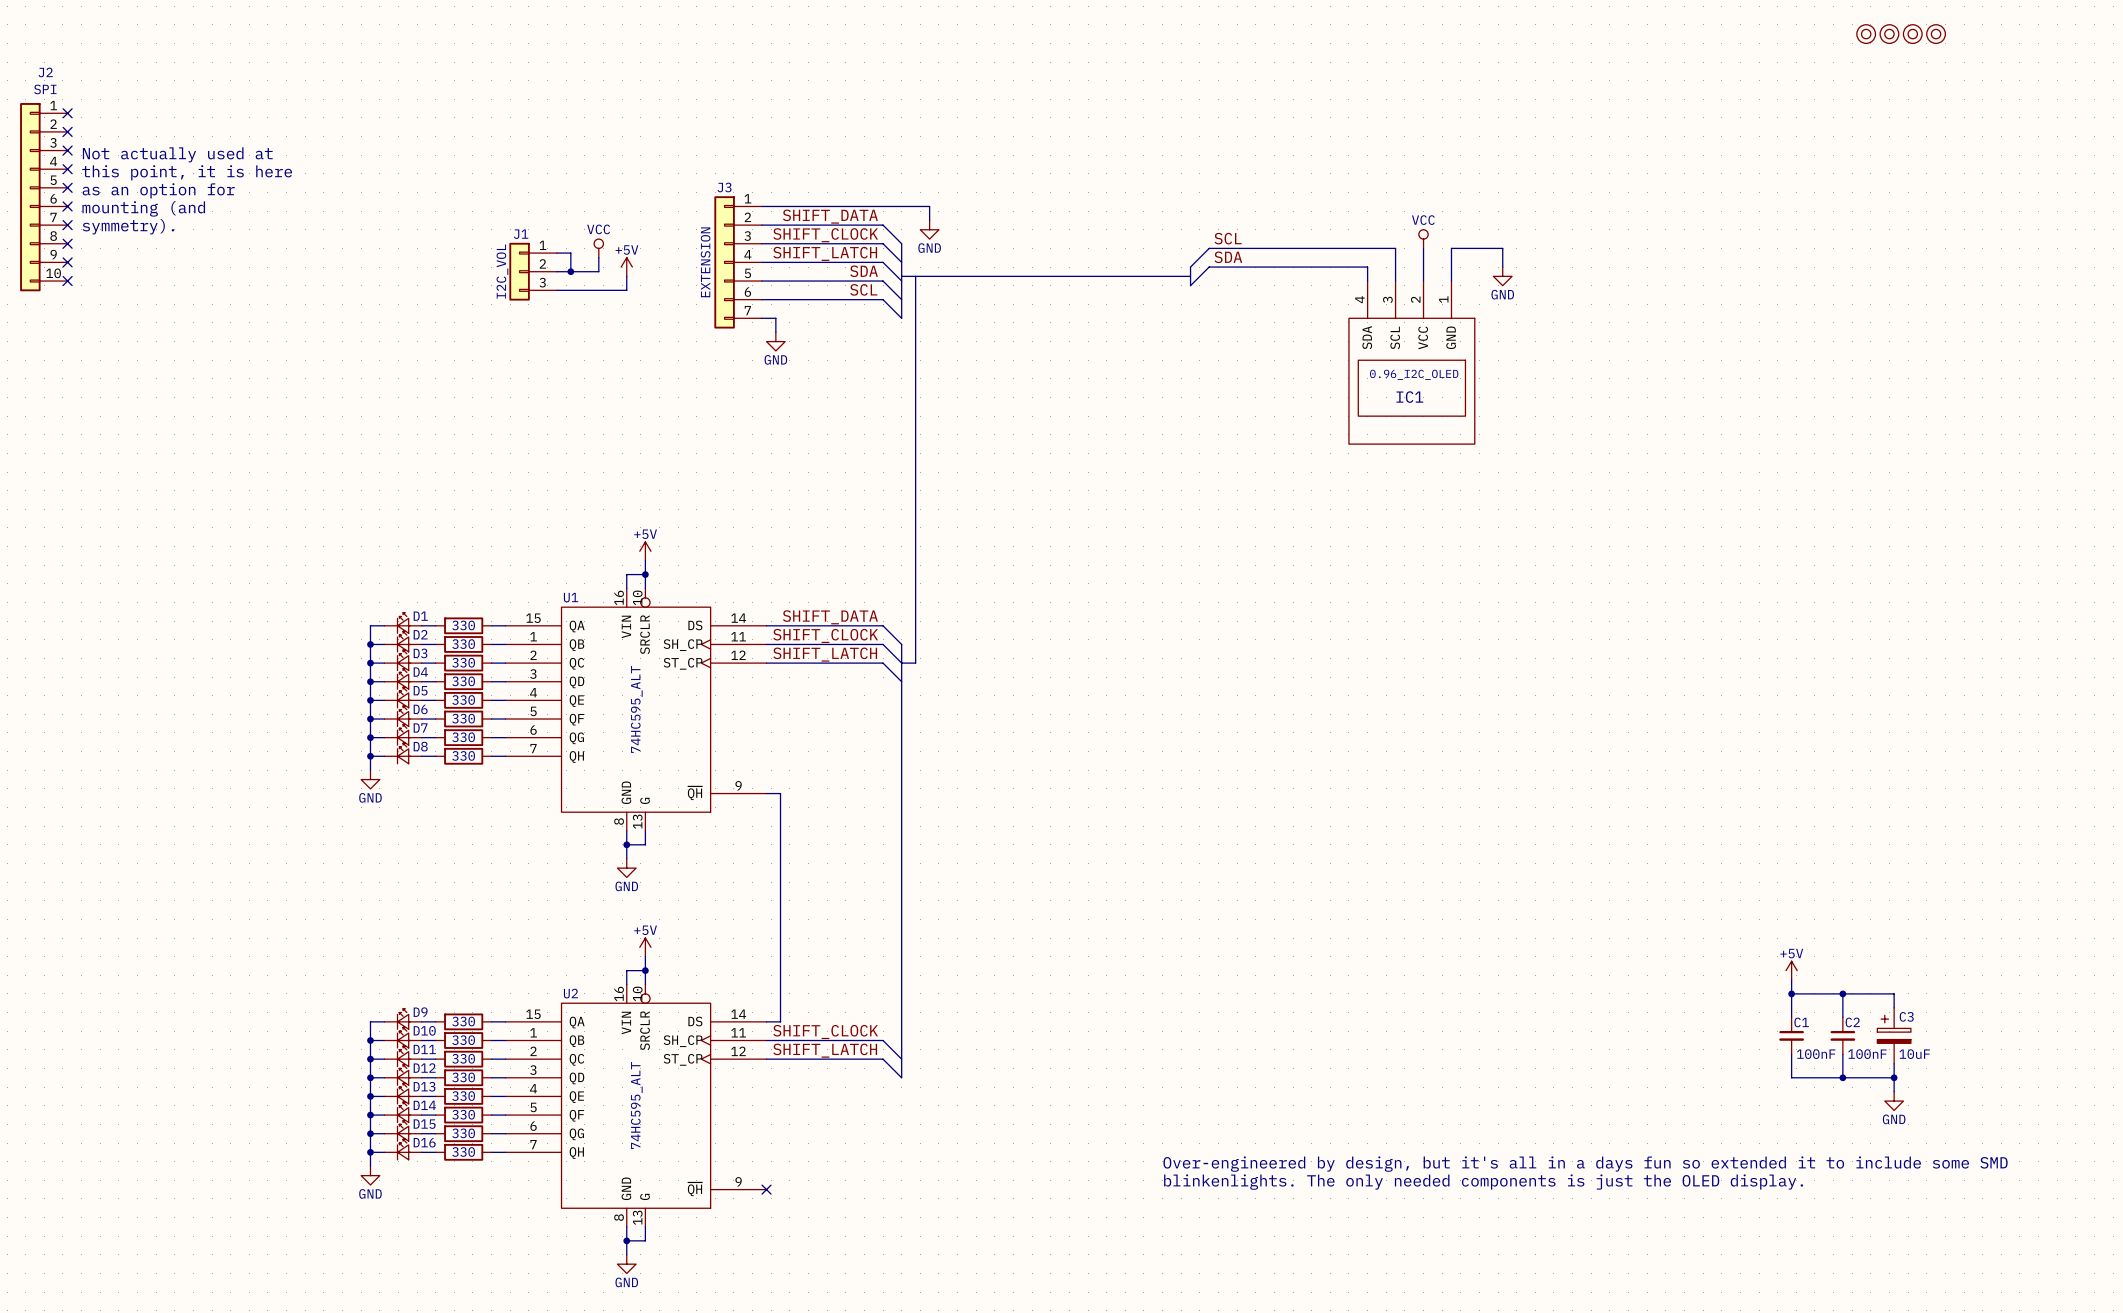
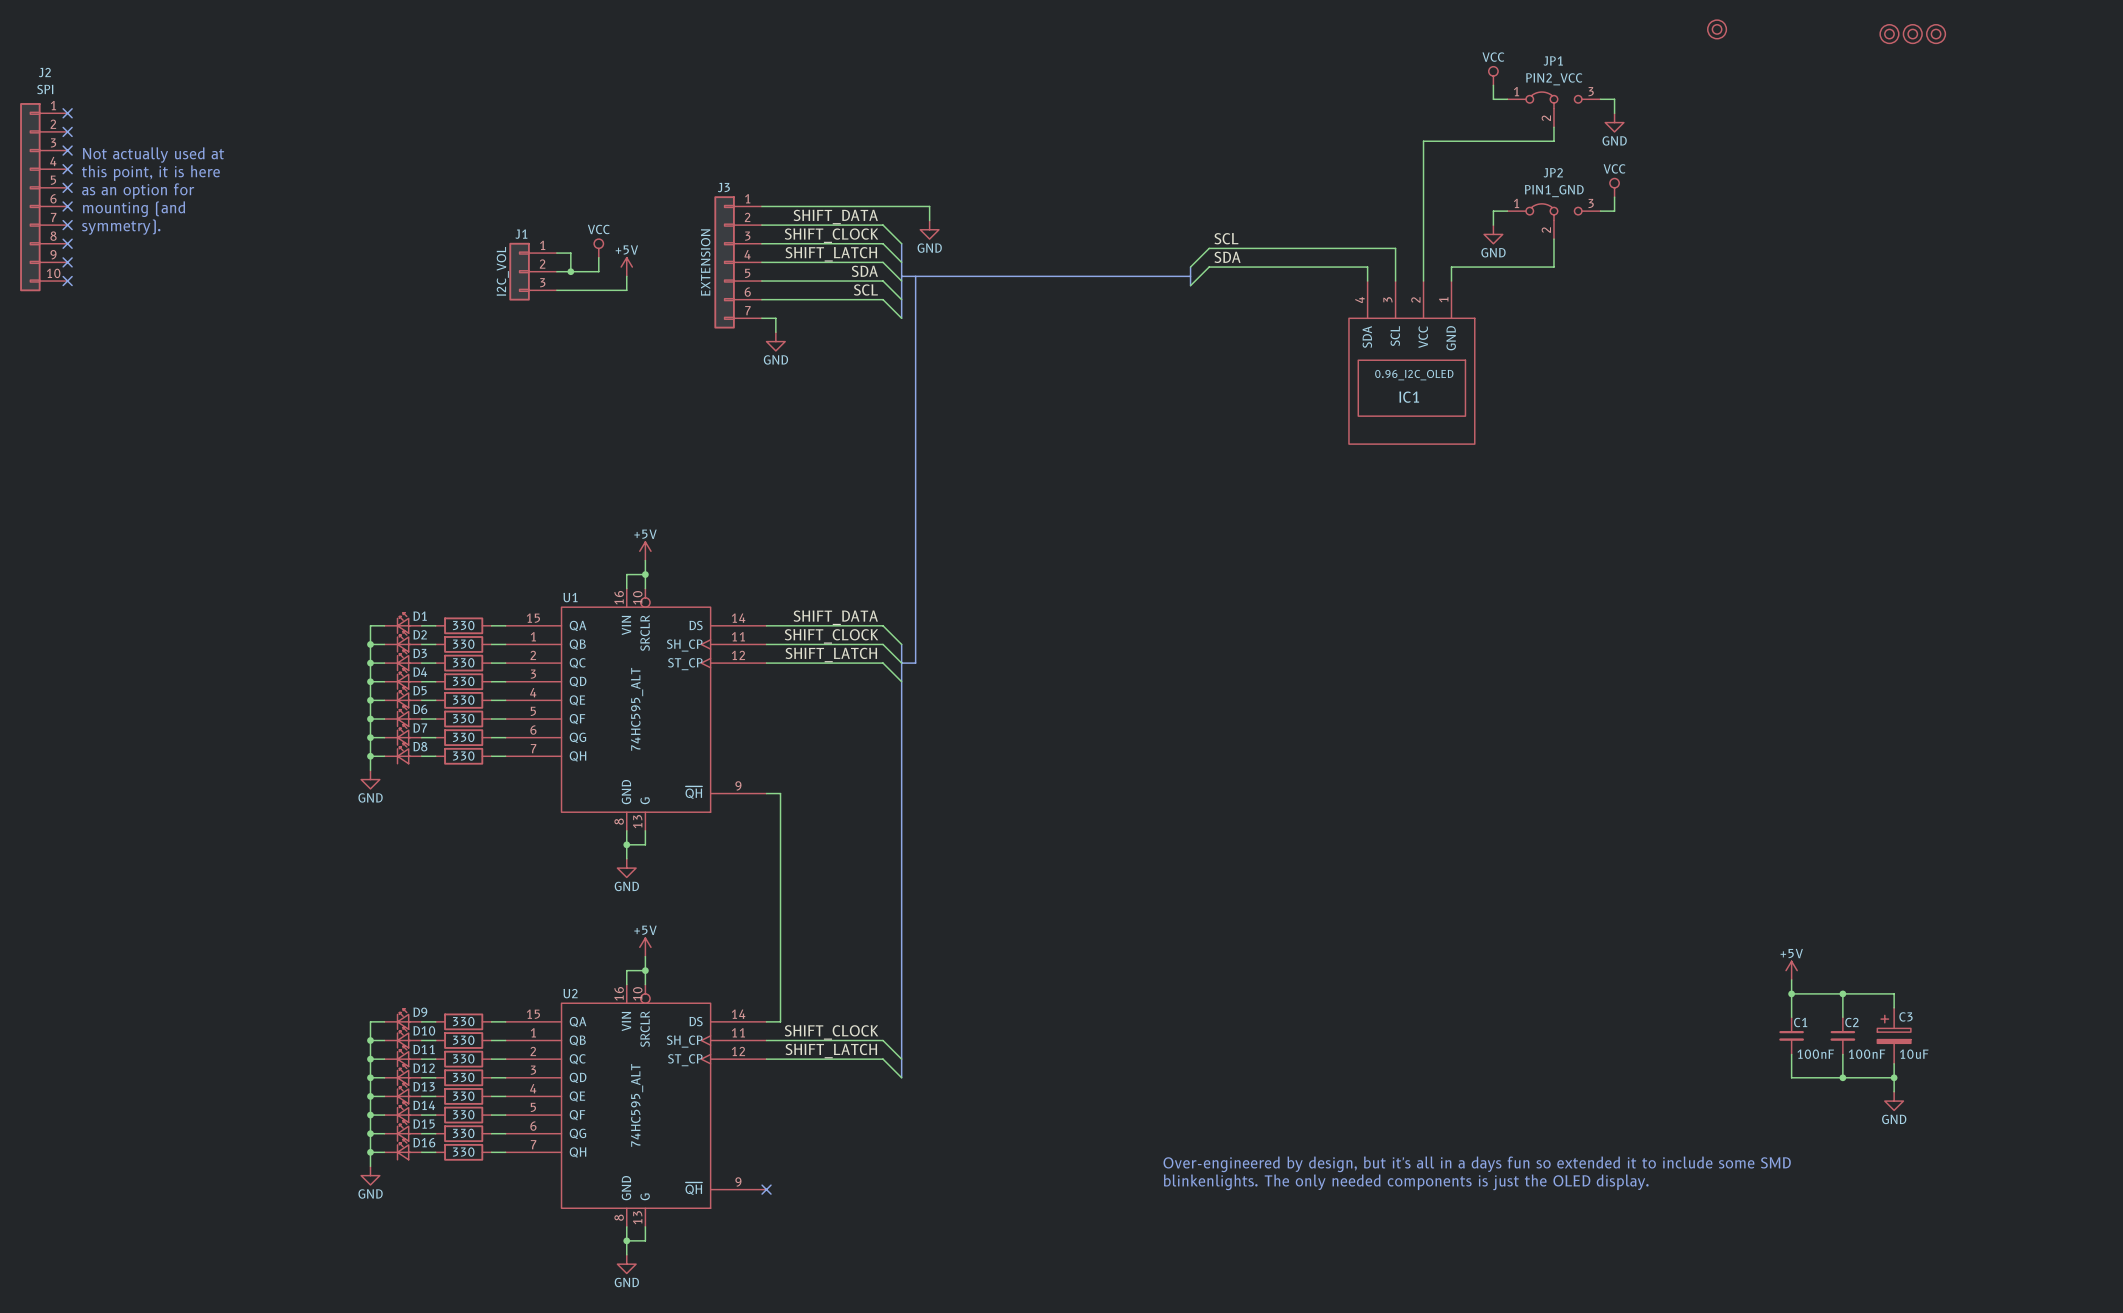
part position: (1866, 34) -> (1717, 29)
power symbol: none -> VCC (1493, 76)
wire: none -> (1493, 85) (1493, 99) (1507, 99)
wire: none -> (1600, 99) (1614, 99) (1614, 113)
JP1: none -> PIN2_VCC (1553, 109)
power symbol: none -> GND (1614, 122)
wire: none -> (1553, 127) (1553, 141) (1423, 141) (1423, 248)
power symbol: none -> VCC (1614, 187)
wire: none -> (1614, 197) (1614, 211) (1600, 211)
wire: none -> (1507, 211) (1493, 211) (1493, 225)
JP2: none -> PIN1_GND (1553, 221)
power symbol: VCC (1423, 239) -> none
wire: (1451, 267) (1451, 248) (1502, 248) (1502, 267) -> (1451, 267) (1553, 267) (1553, 239)
power symbol position: GND (1502, 276) -> GND (1493, 234)

